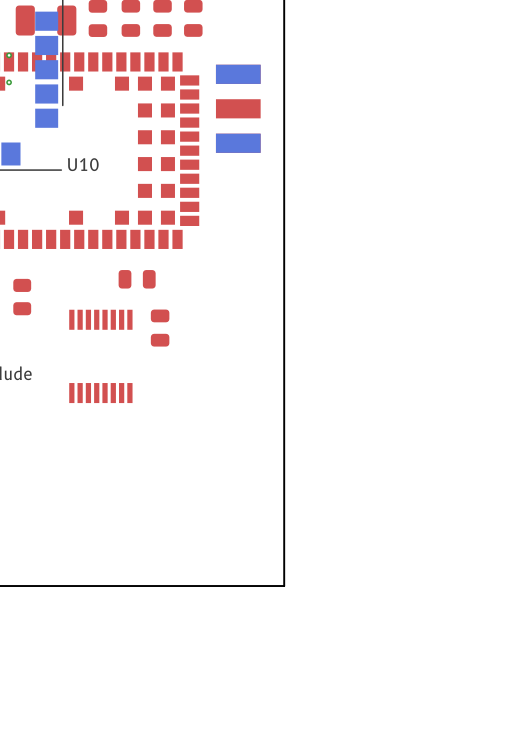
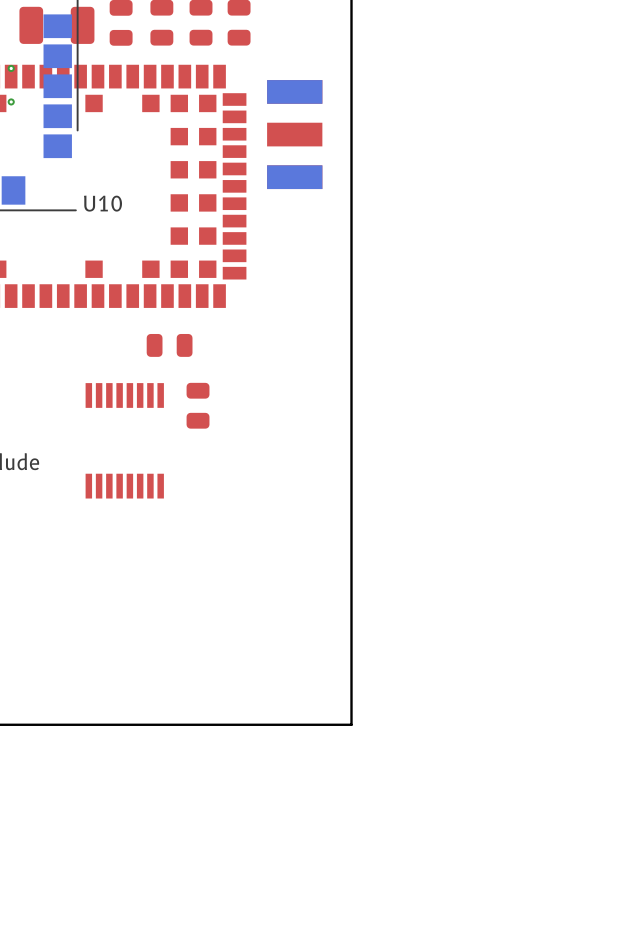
part: (22, 297) -> none

